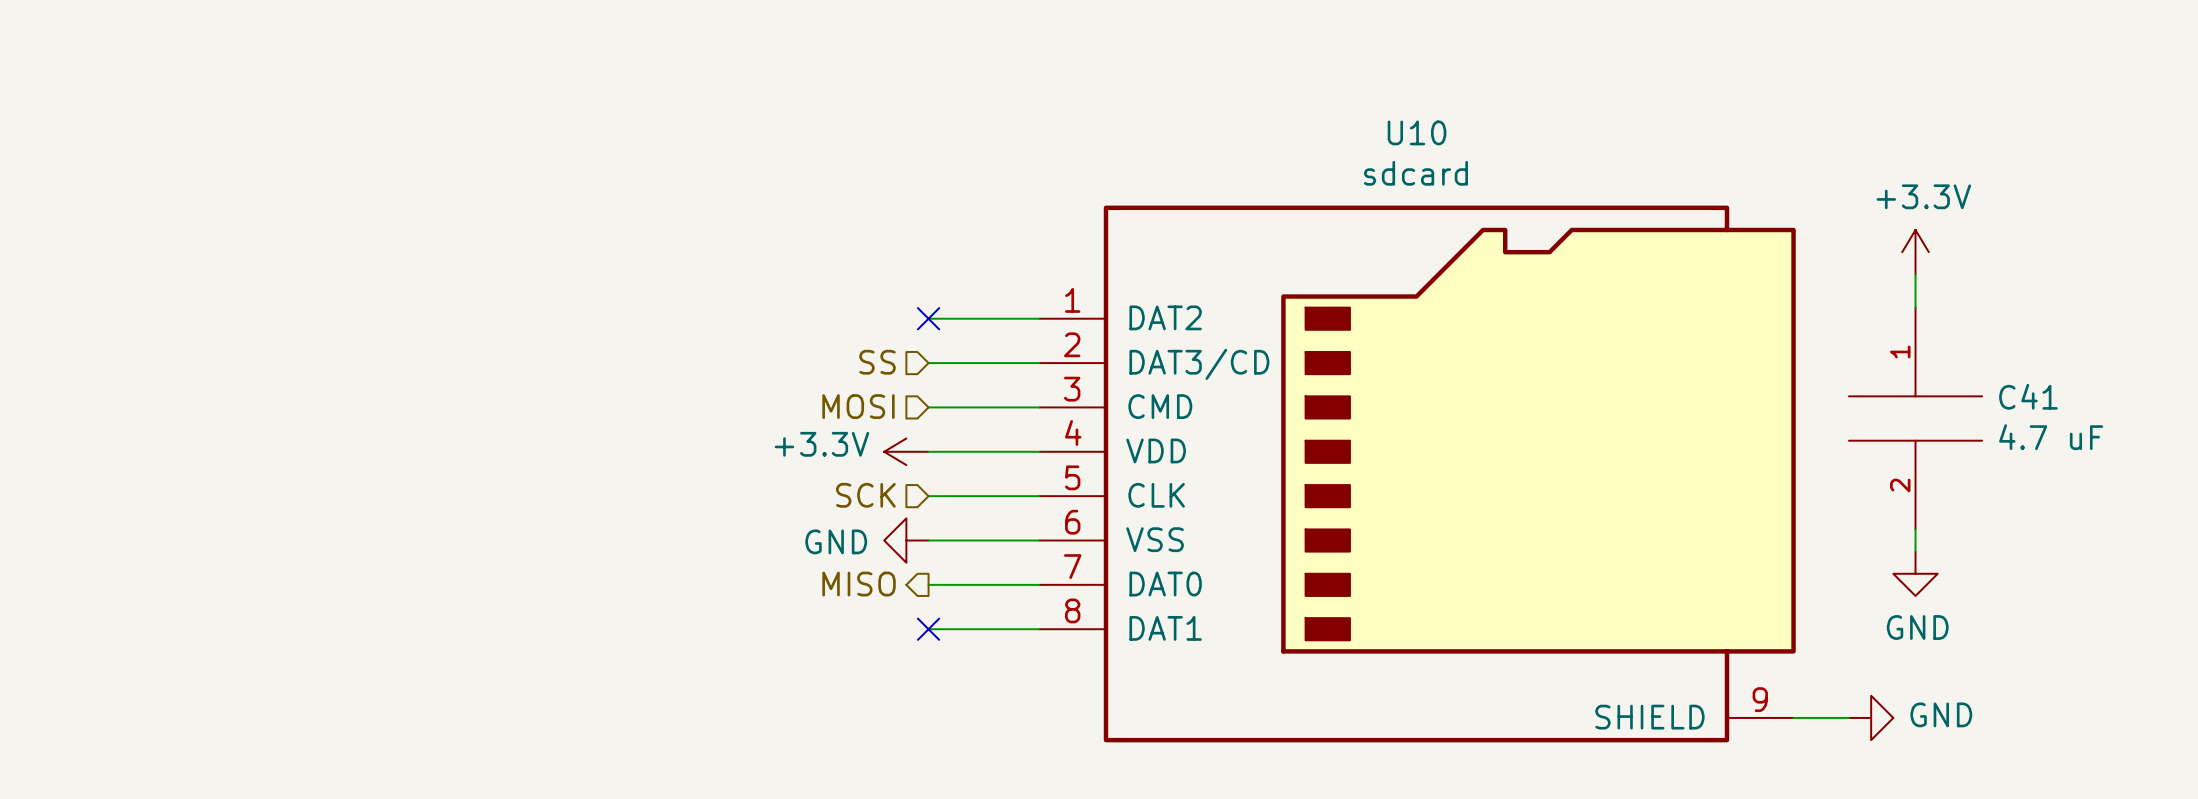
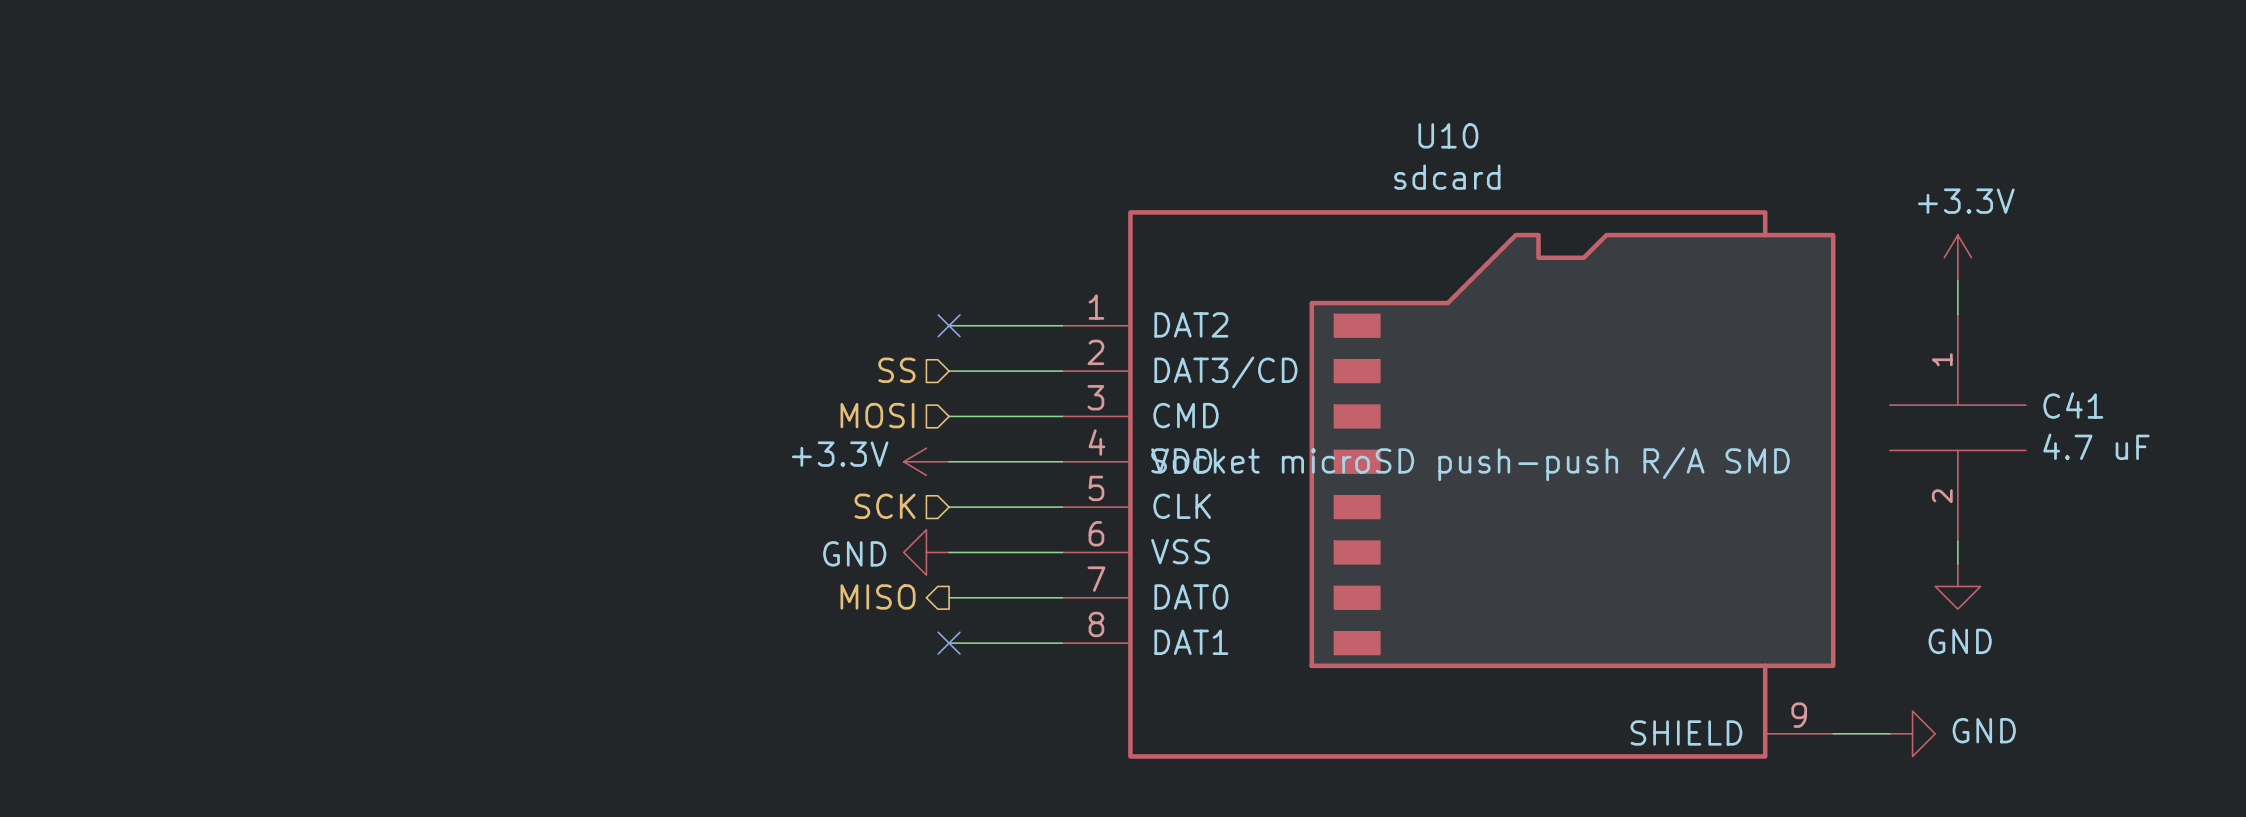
U10 text: none -> Socket microSD push-push R/A SMD (1470, 464)

